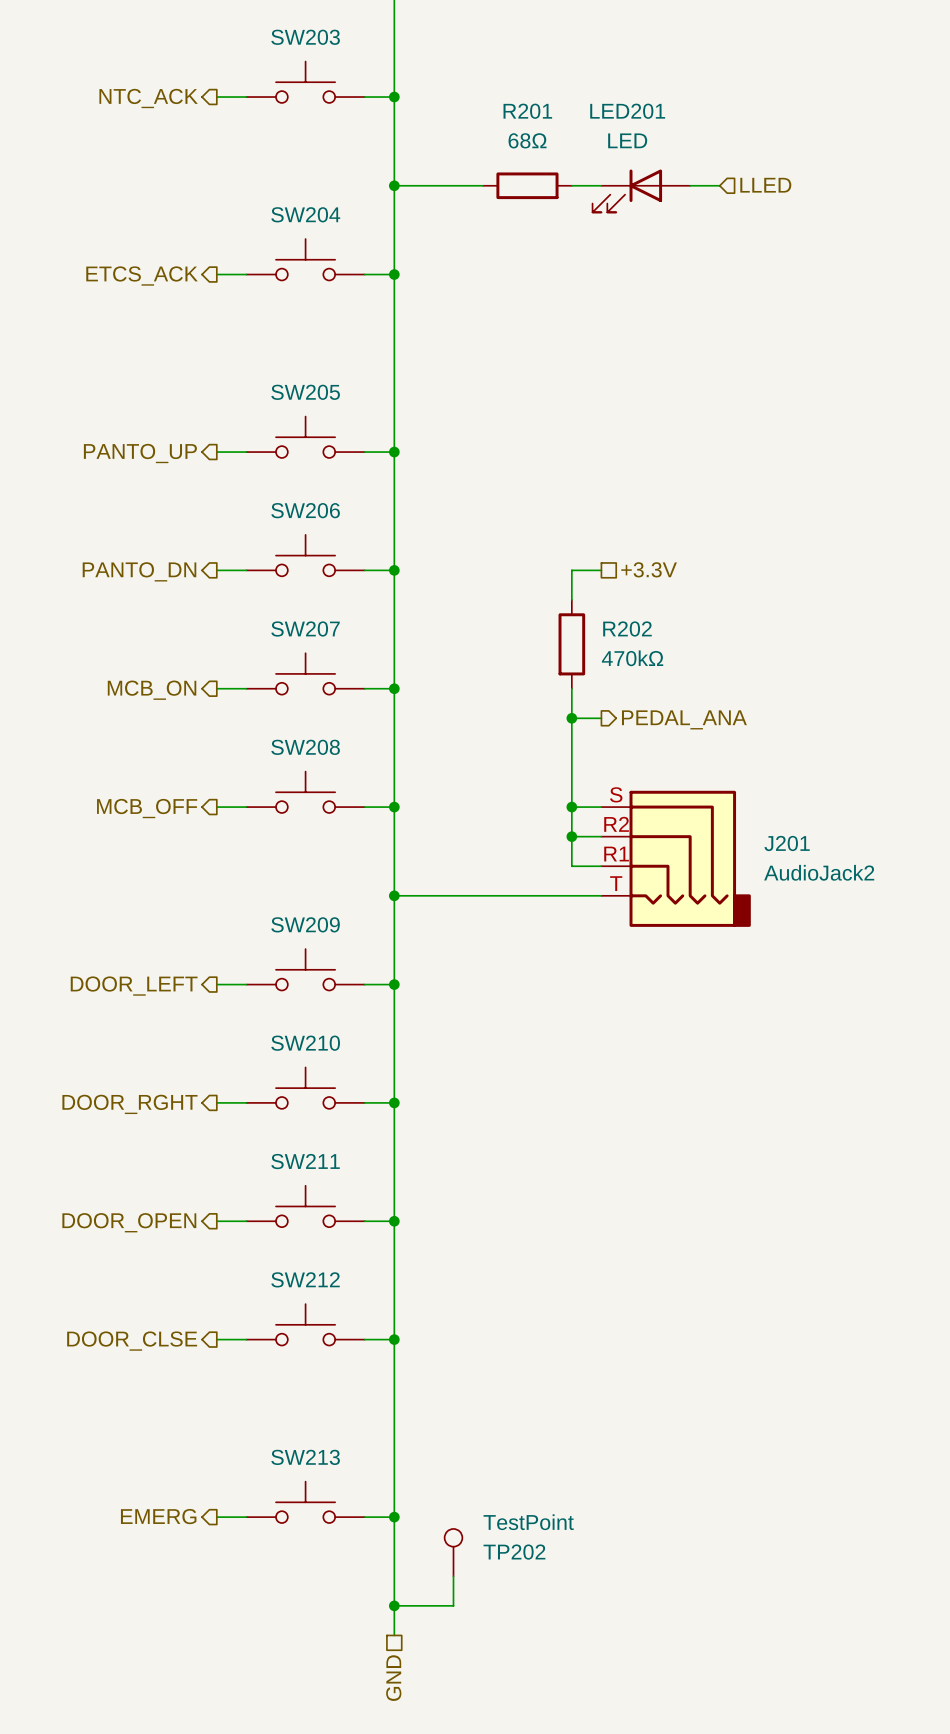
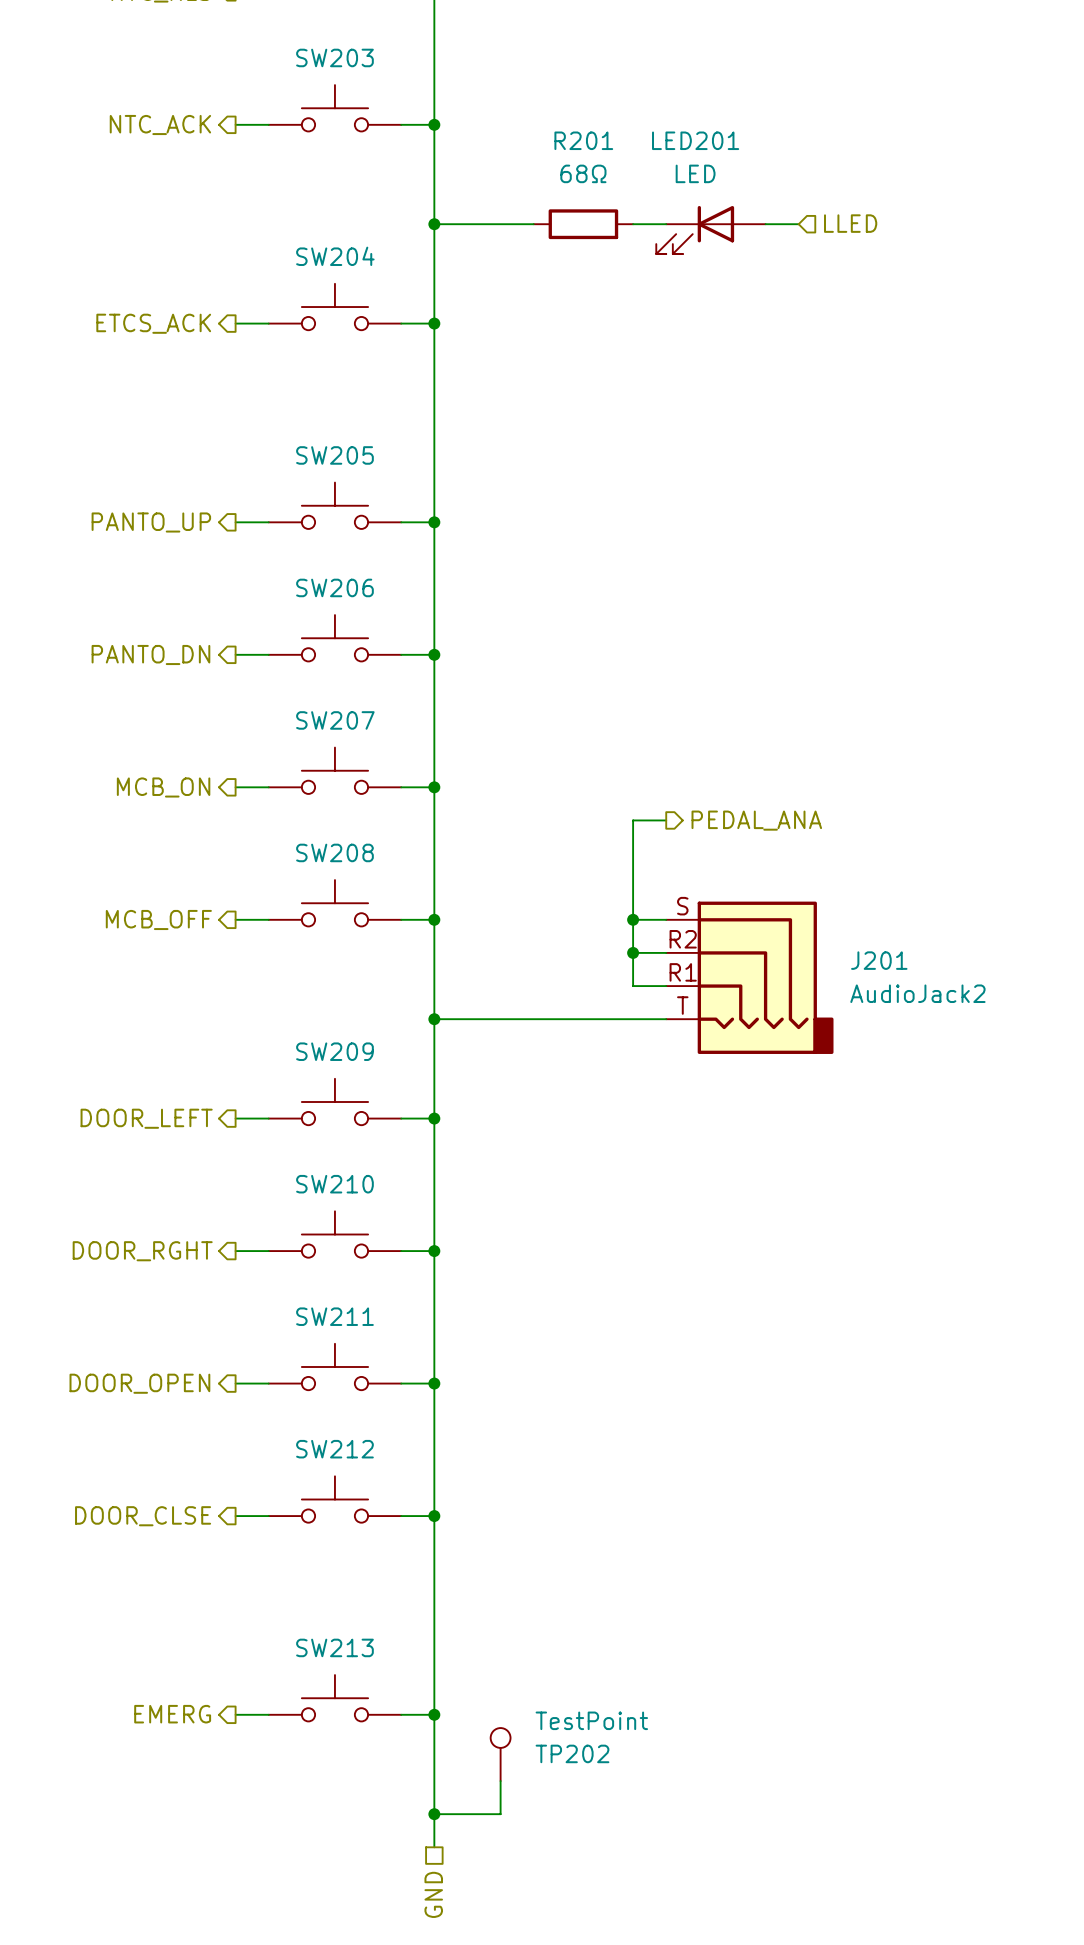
hierarchical label: +3.3V (649, 569) -> none
wire: (601, 570) (571, 570) (571, 599) -> none
R202: 470kΩ (571, 644) -> none
wire: (571, 688) (571, 718) -> none
junction: (571, 718) -> none

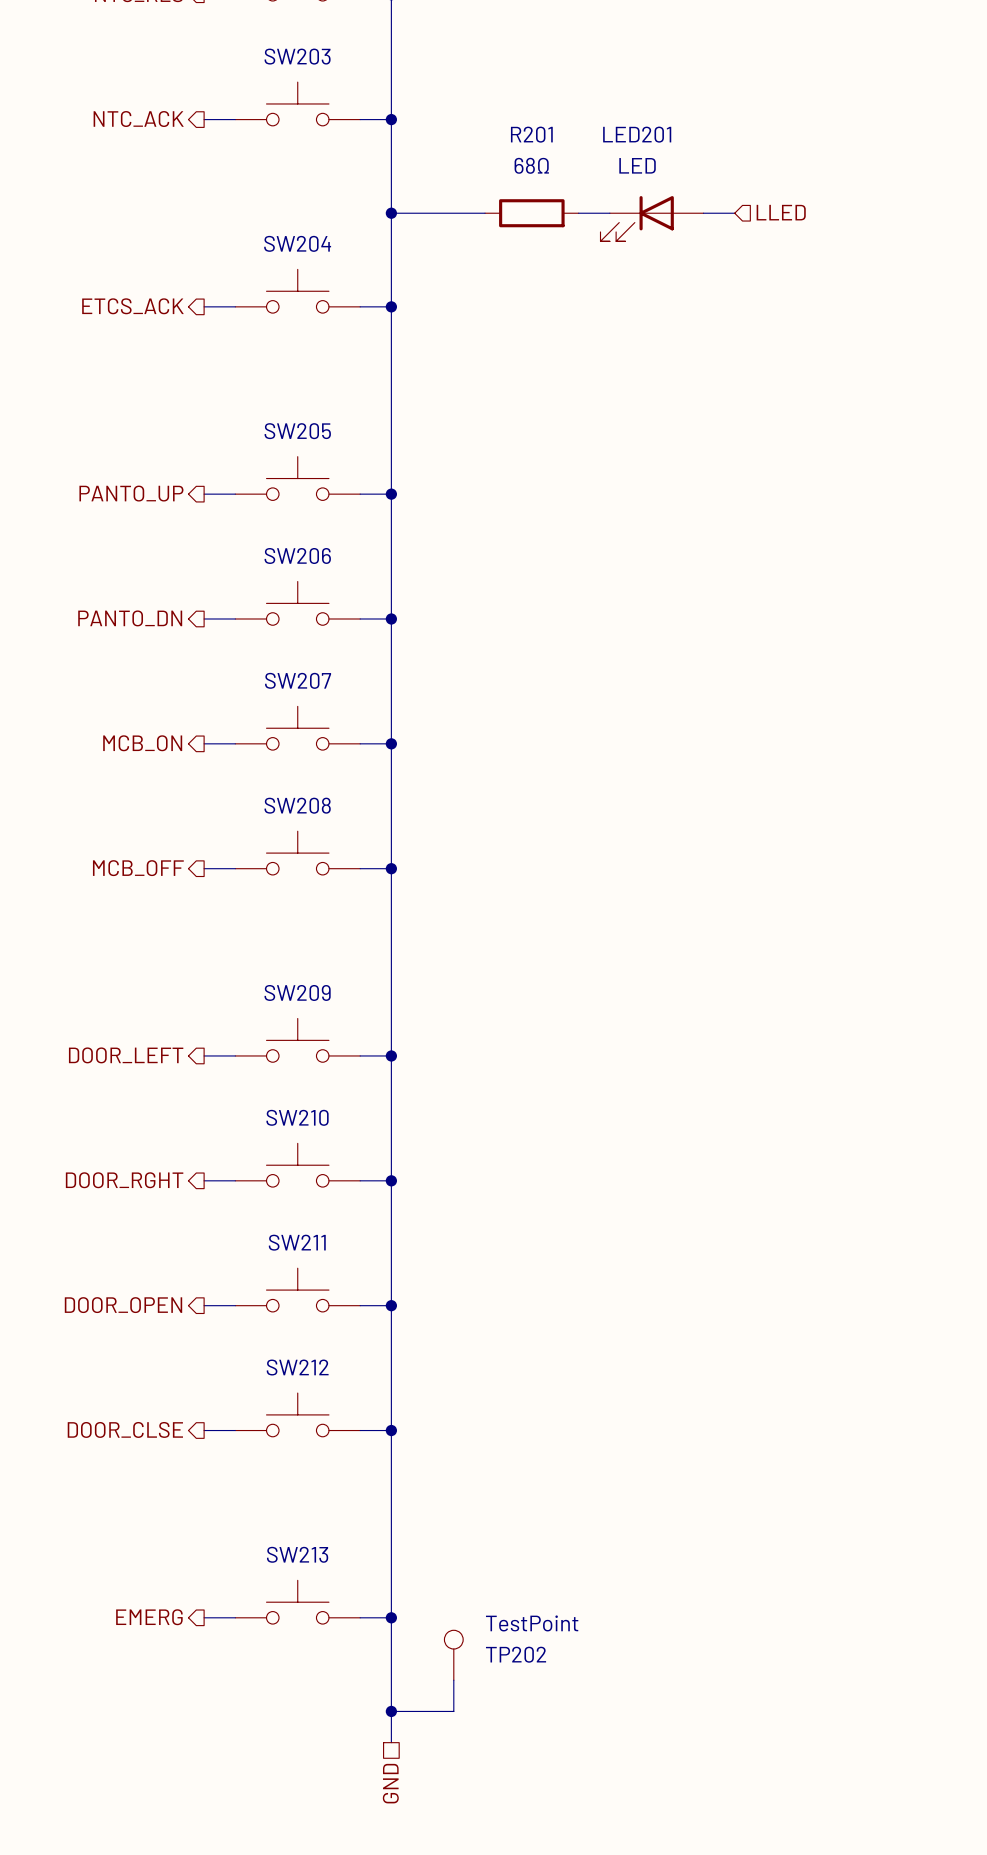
wire: (666, 820) (633, 820) (633, 986) (666, 986) -> none
hierarchical label: PEDAL_ANA (756, 820) -> none
wire: (633, 919) (666, 919) -> none
junction: (633, 919) -> none
wire: (633, 952) (666, 952) -> none
junction: (633, 952) -> none
J201: AudioJack2 (749, 977) -> none
wire: (434, 1019) (666, 1019) -> none
junction: (434, 1019) -> none

